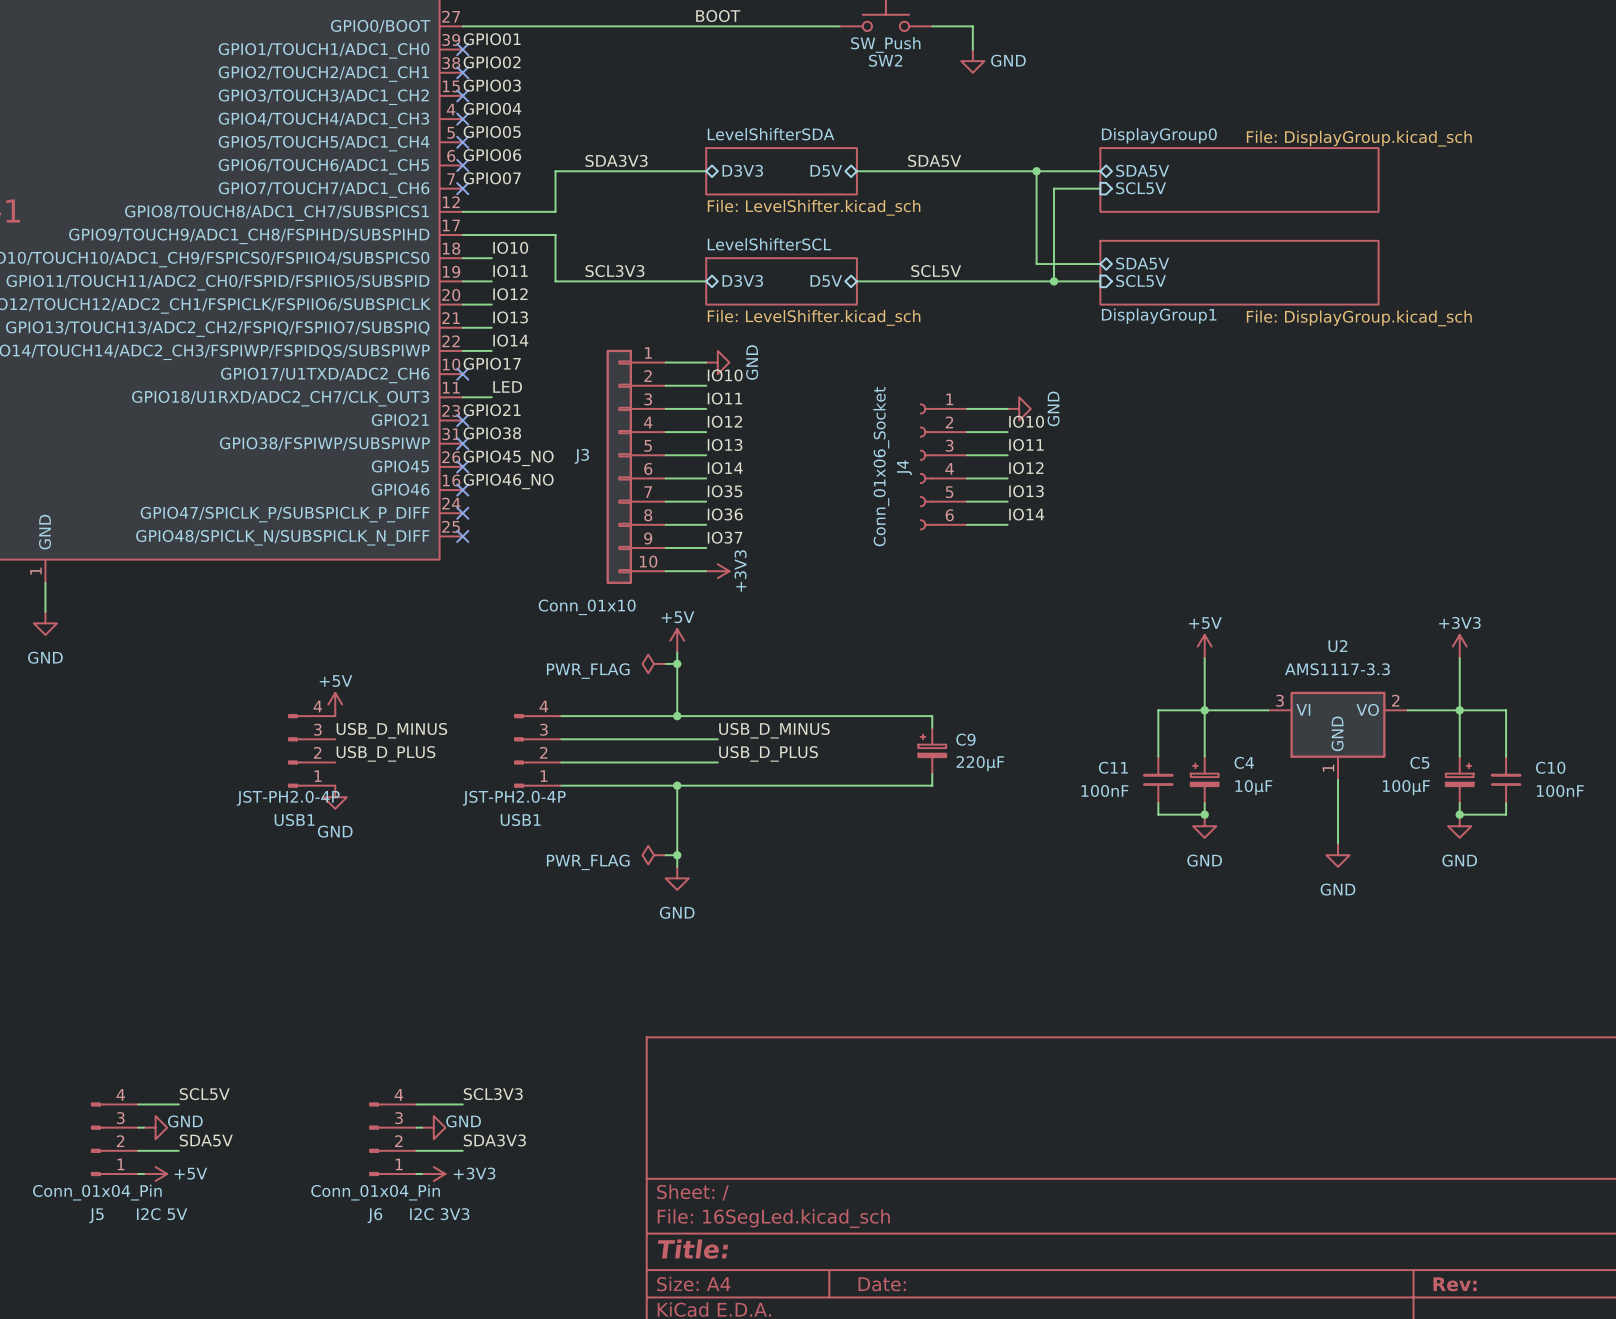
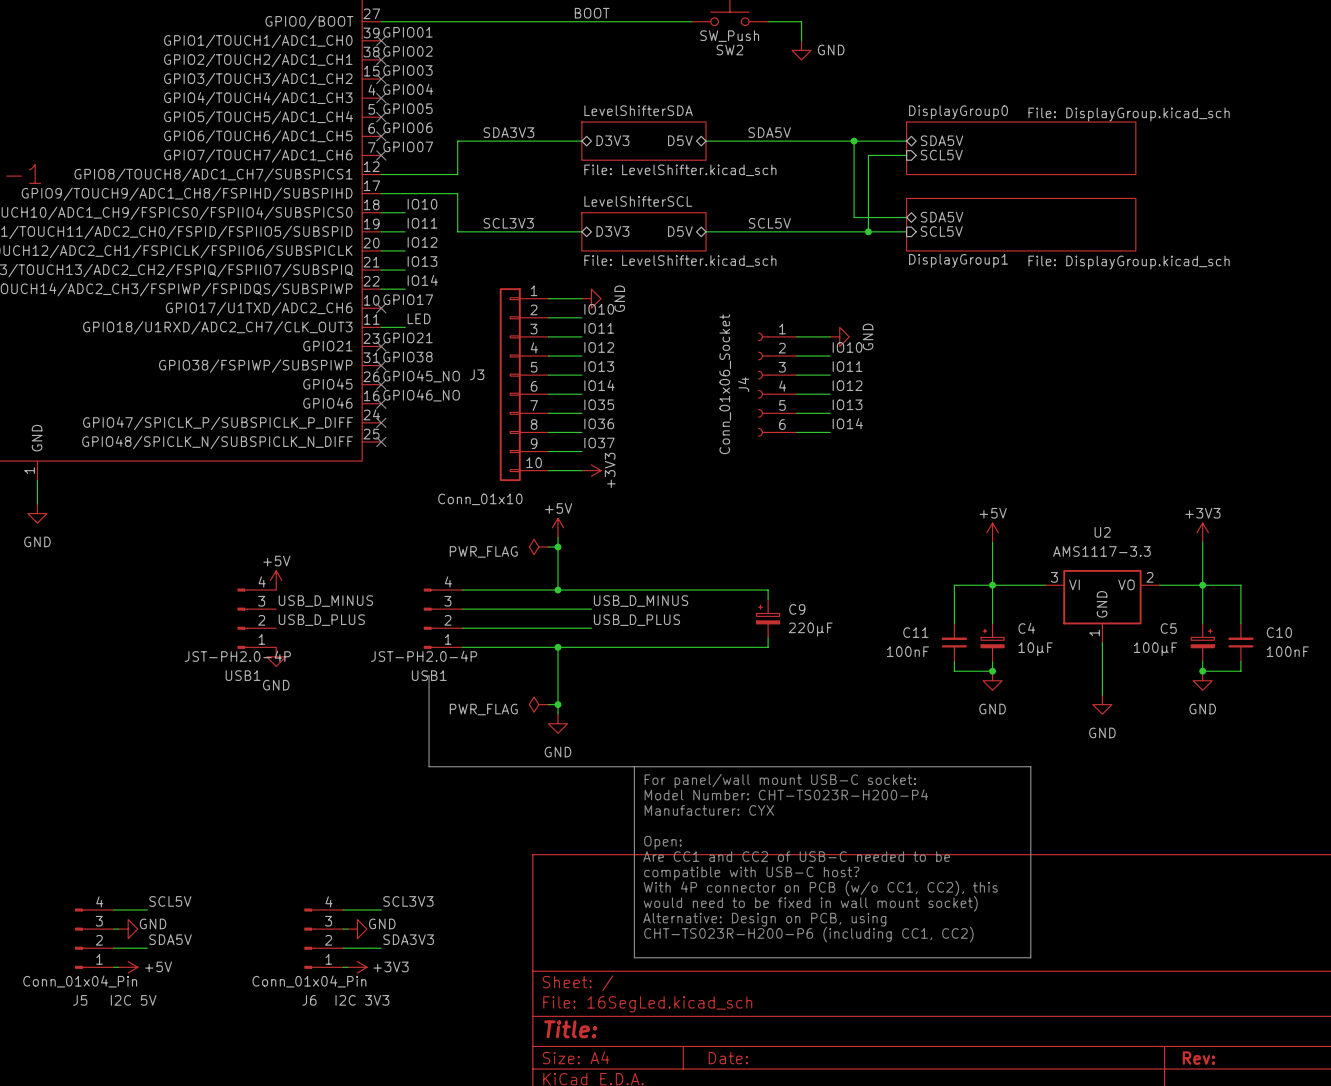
line: none -> (424, 675) (429, 675) (429, 766) (1030, 766) (1030, 957) (634, 957) (634, 766)
text: none -> For panel/wall mount USB-C socket: (780, 781)
text: none -> Model Number: CHT-TS023R-H200-P4 (786, 794)
text: none -> Manufacturer: CYX (709, 810)
text: none -> Open: (662, 842)
text: none -> Are CC1 and CC2 of USB-C needed to be (796, 856)
text: none -> compatible with USB-C host? (751, 873)
text: none -> With 4P connector on PCB (w/o CC1, CC2), this (820, 888)
text: none -> would need to be fixed in wall mount socket) (810, 903)
text: none -> Alternative: Design on PCB, using (764, 919)
text: none -> CHT-TS023R-H200-P6 (including CC1, CC2) (808, 934)

